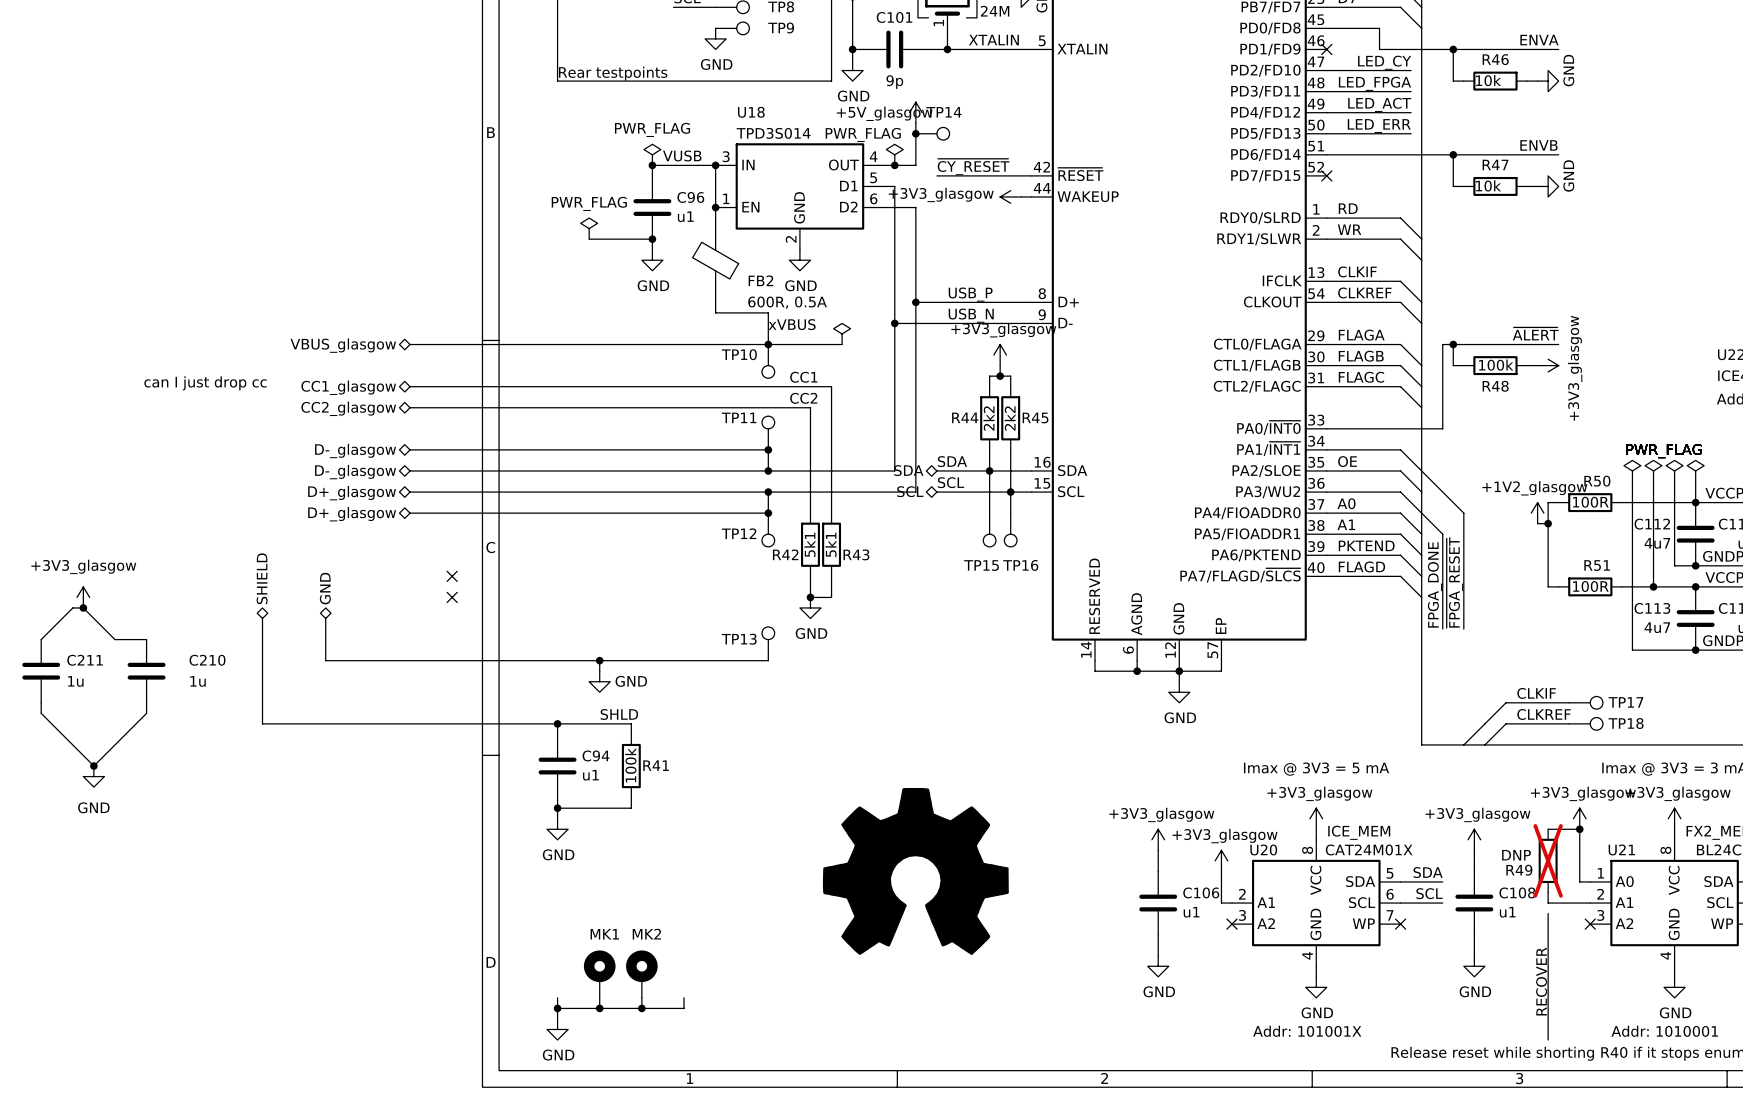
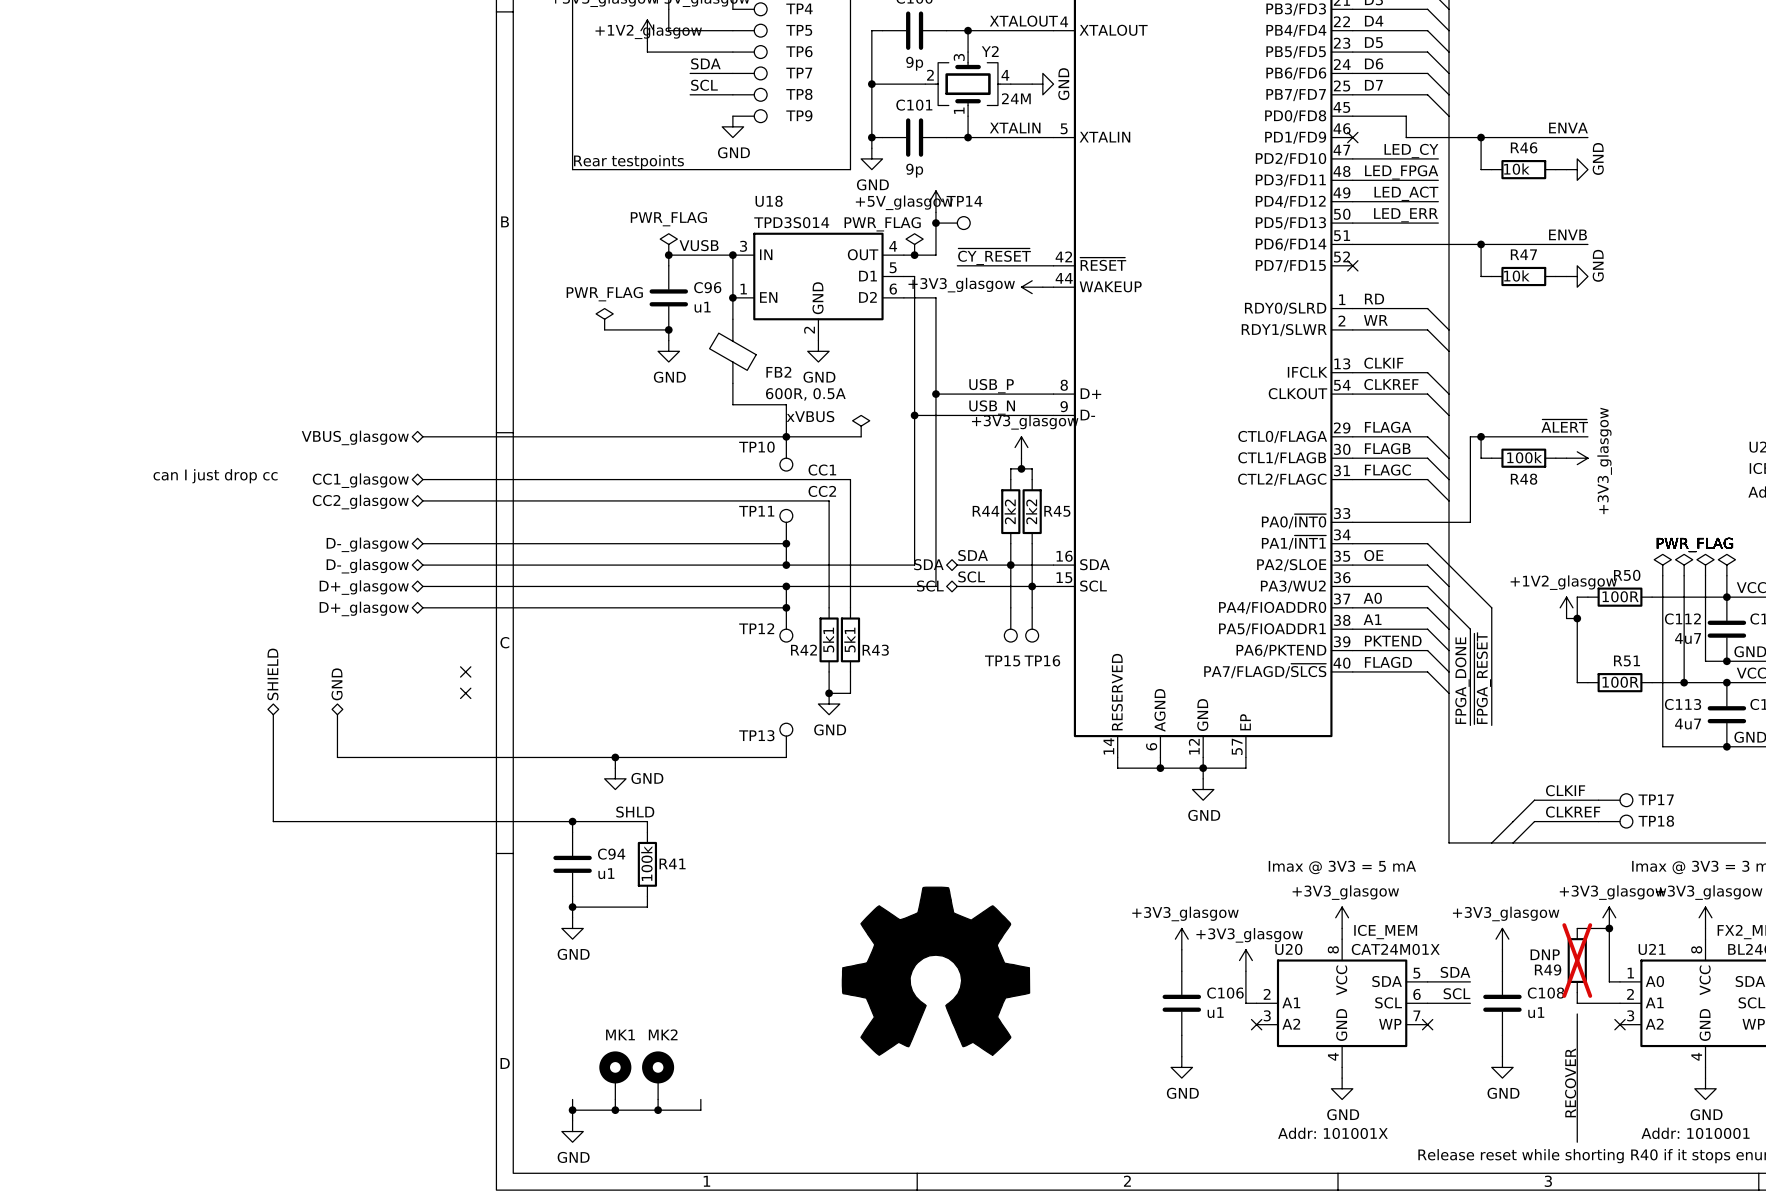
power symbol: +3V3_glasgow (83, 597) -> none
junction: (83, 607) -> none
wire: (41, 639) (72, 607) (83, 607) (114, 639) (146, 639) -> none
C211: 1u (41, 671) -> none
C210: 1u (146, 671) -> none
wire: (41, 702) (41, 713) (93, 766) (146, 713) (146, 702) -> none
junction: (93, 766) -> none
power symbol: GND (93, 776) -> none

